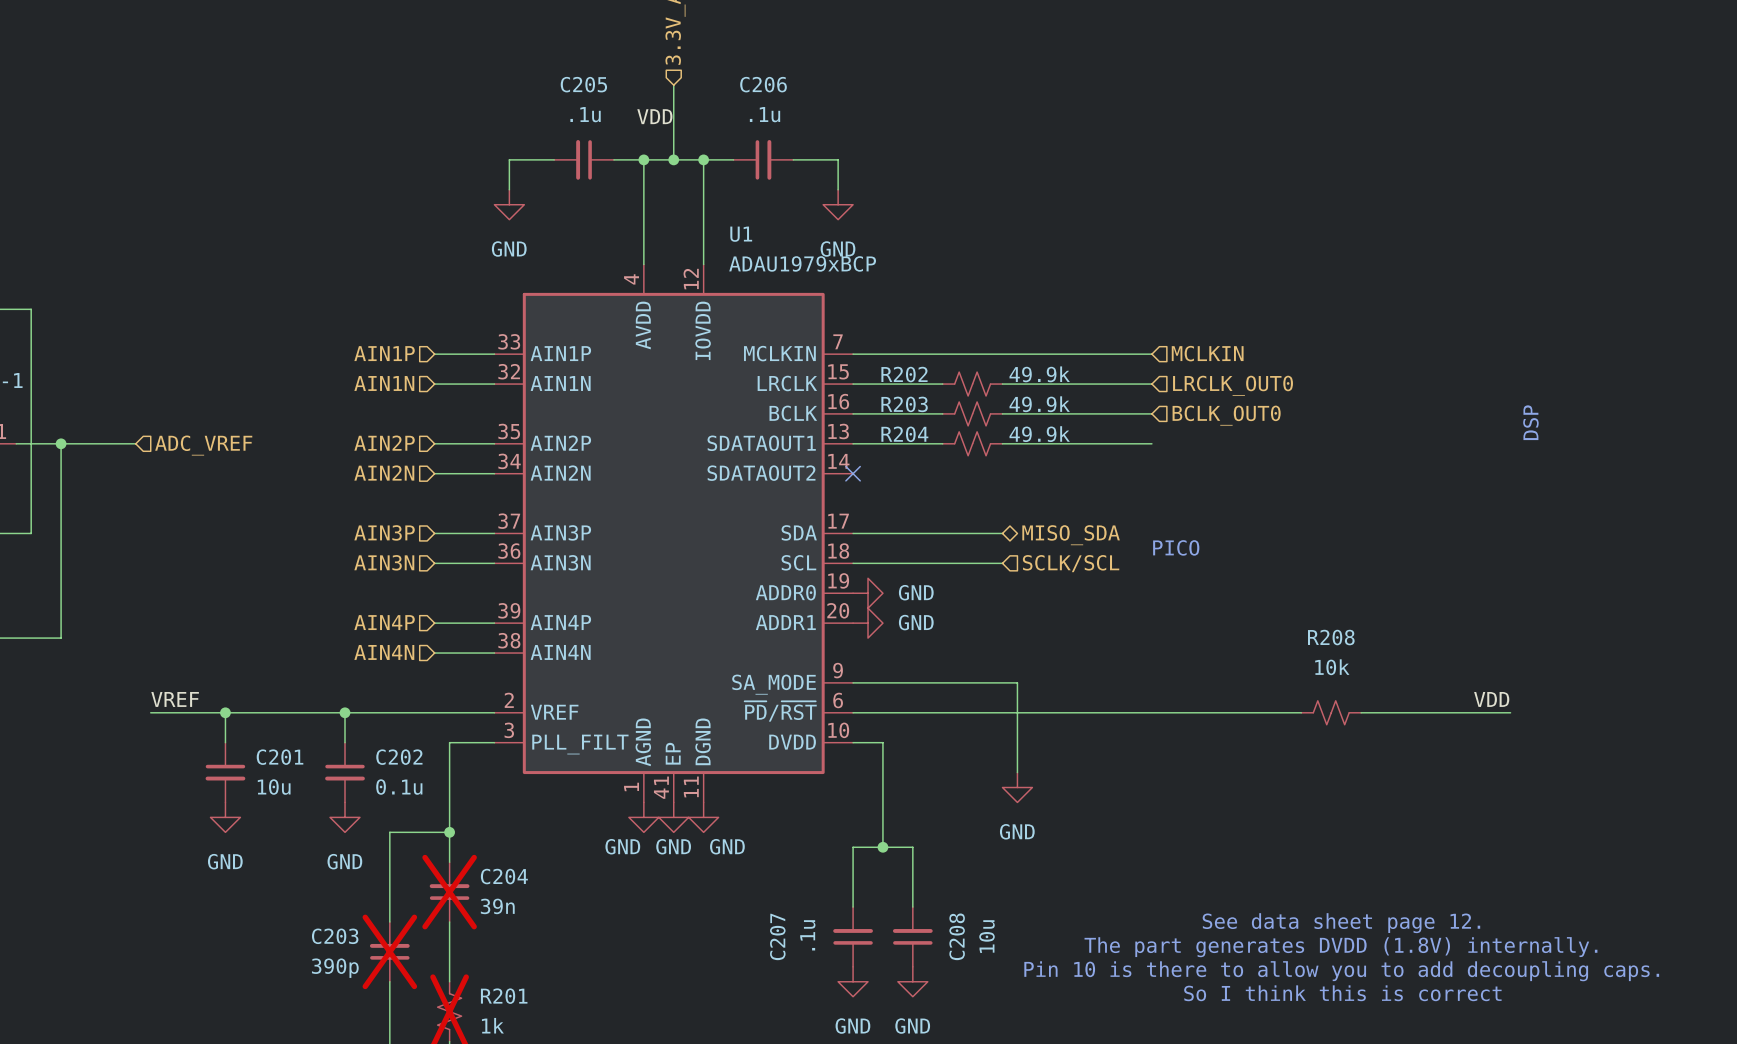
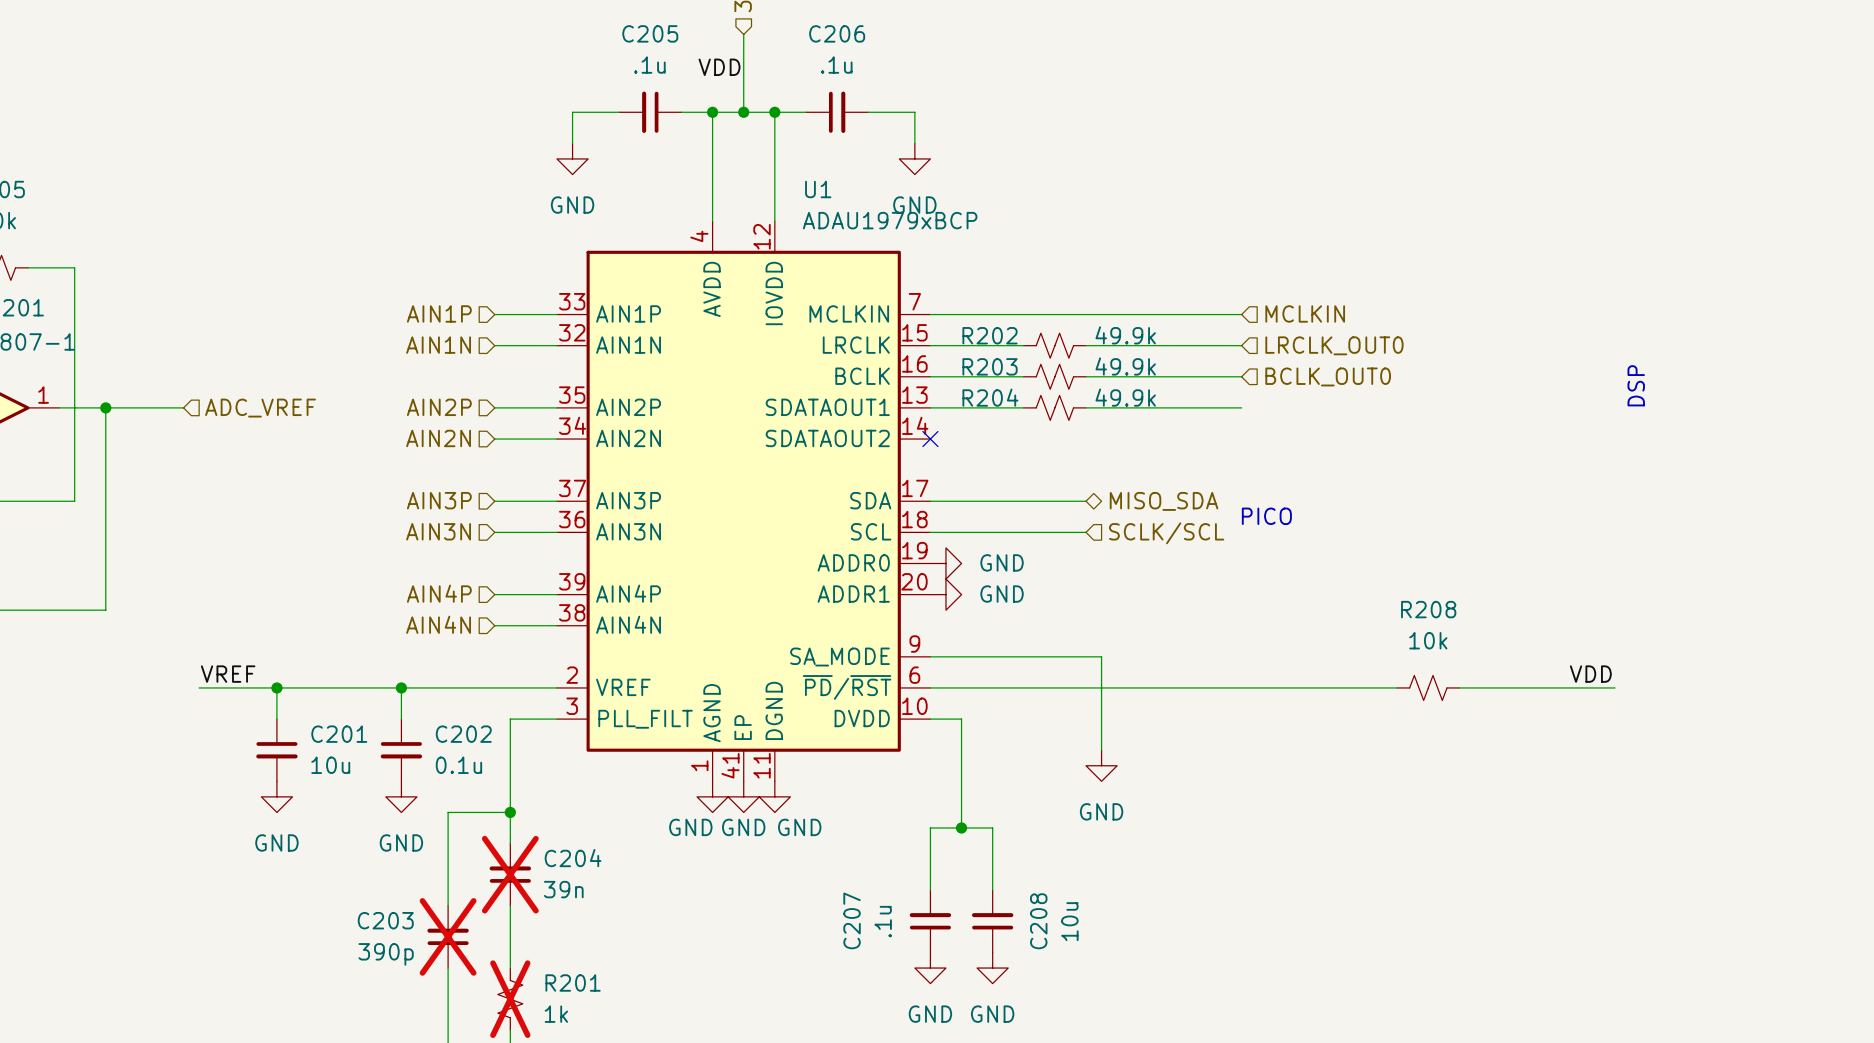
text: See data sheet page 12. (1341, 923) -> none
text: The part generates DVDD (1.8V) internally. (1340, 947) -> none
text: Pin 10 is there to allow you to add decoupling caps. (1341, 971) -> none
text: So I think this is correct (1342, 993) -> none

